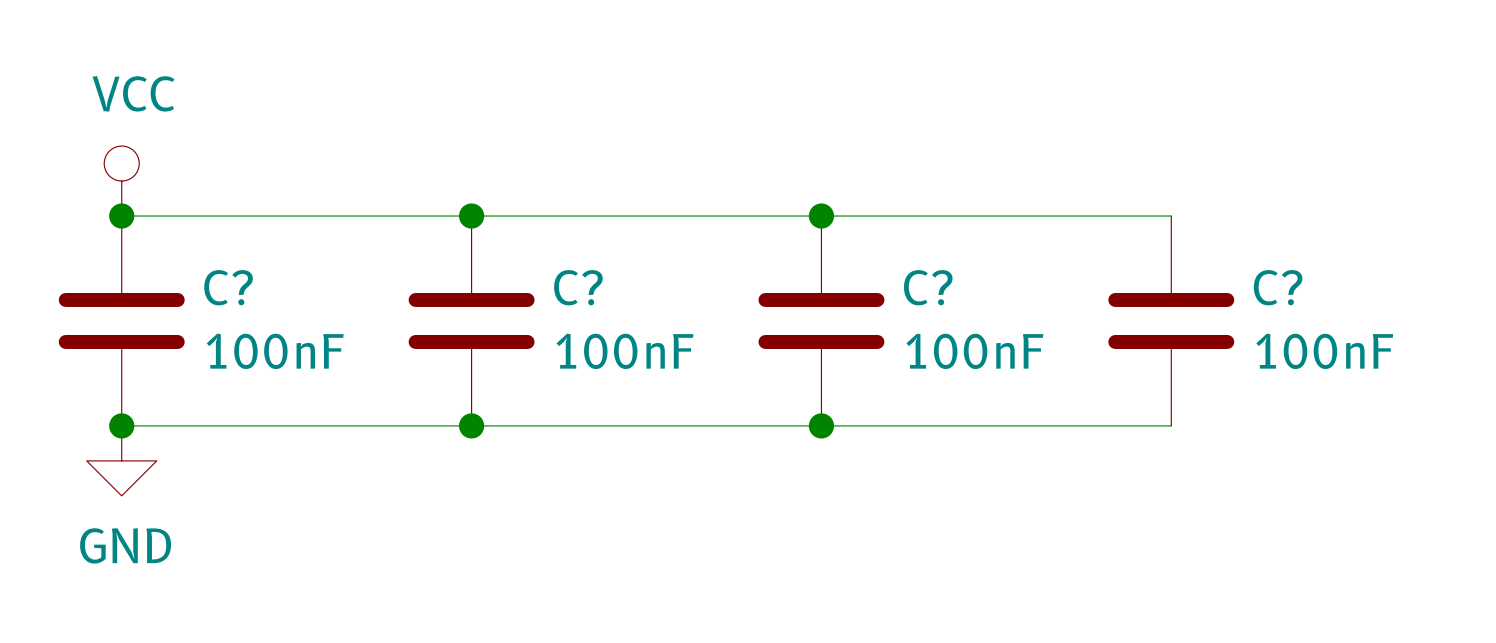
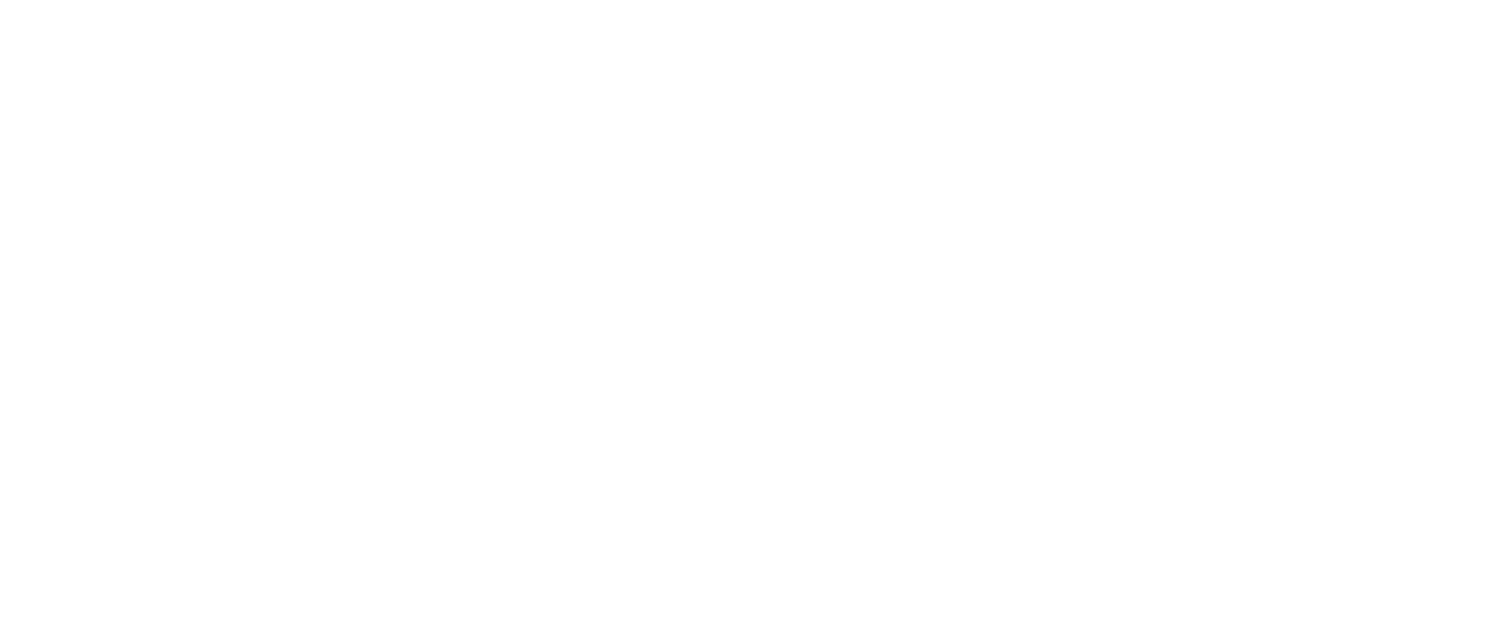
power symbol: VCC (121, 181) -> none
wire: (121, 216) (1171, 216) -> none
junction: (121, 216) -> none
junction: (471, 216) -> none
junction: (821, 216) -> none
C?: 100nF (121, 320) -> none
C?: 100nF (471, 320) -> none
C?: 100nF (821, 320) -> none
C?: 100nF (1171, 320) -> none
wire: (121, 425) (1171, 425) -> none
junction: (121, 425) -> none
junction: (471, 425) -> none
junction: (821, 425) -> none
power symbol: GND (121, 460) -> none

